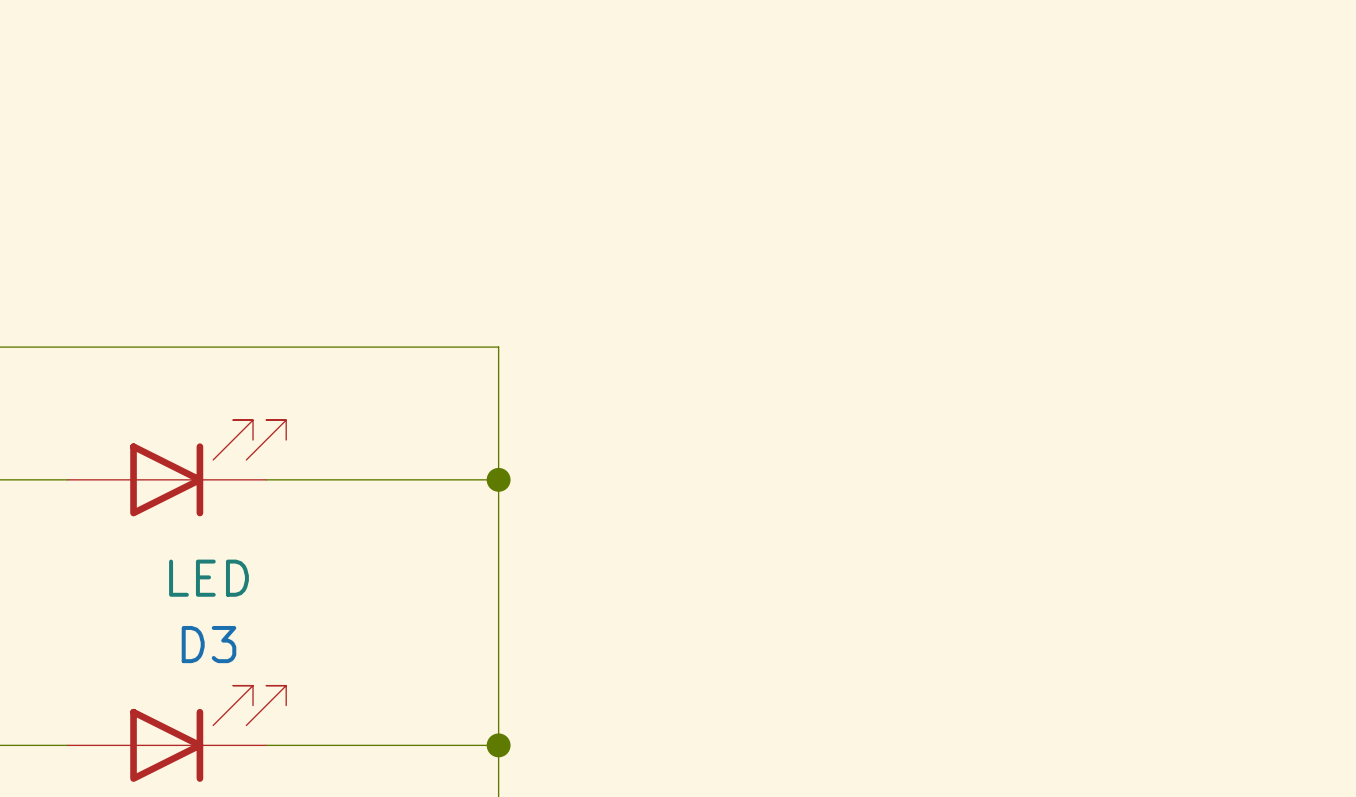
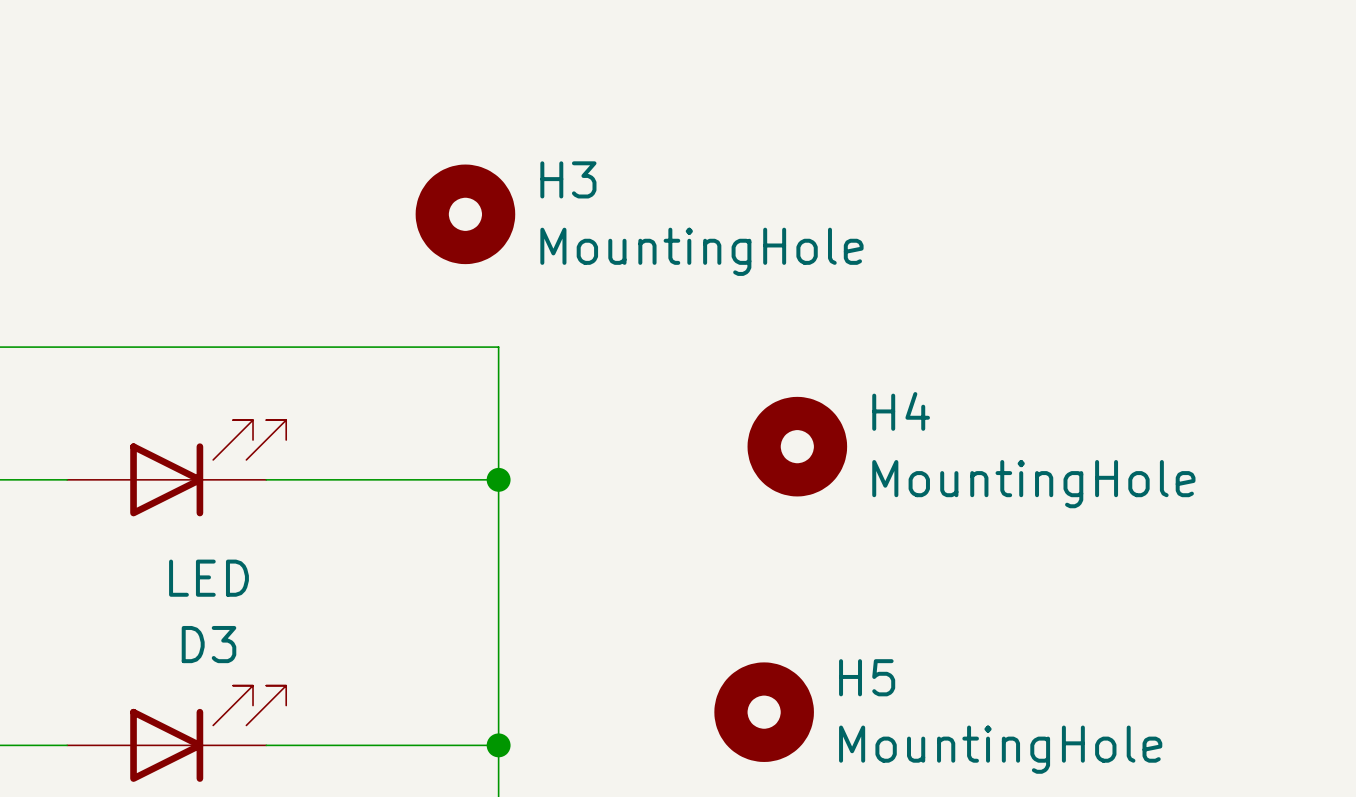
H3: none -> MountingHole (465, 214)
H4: none -> MountingHole (797, 446)
H5: none -> MountingHole (764, 712)

